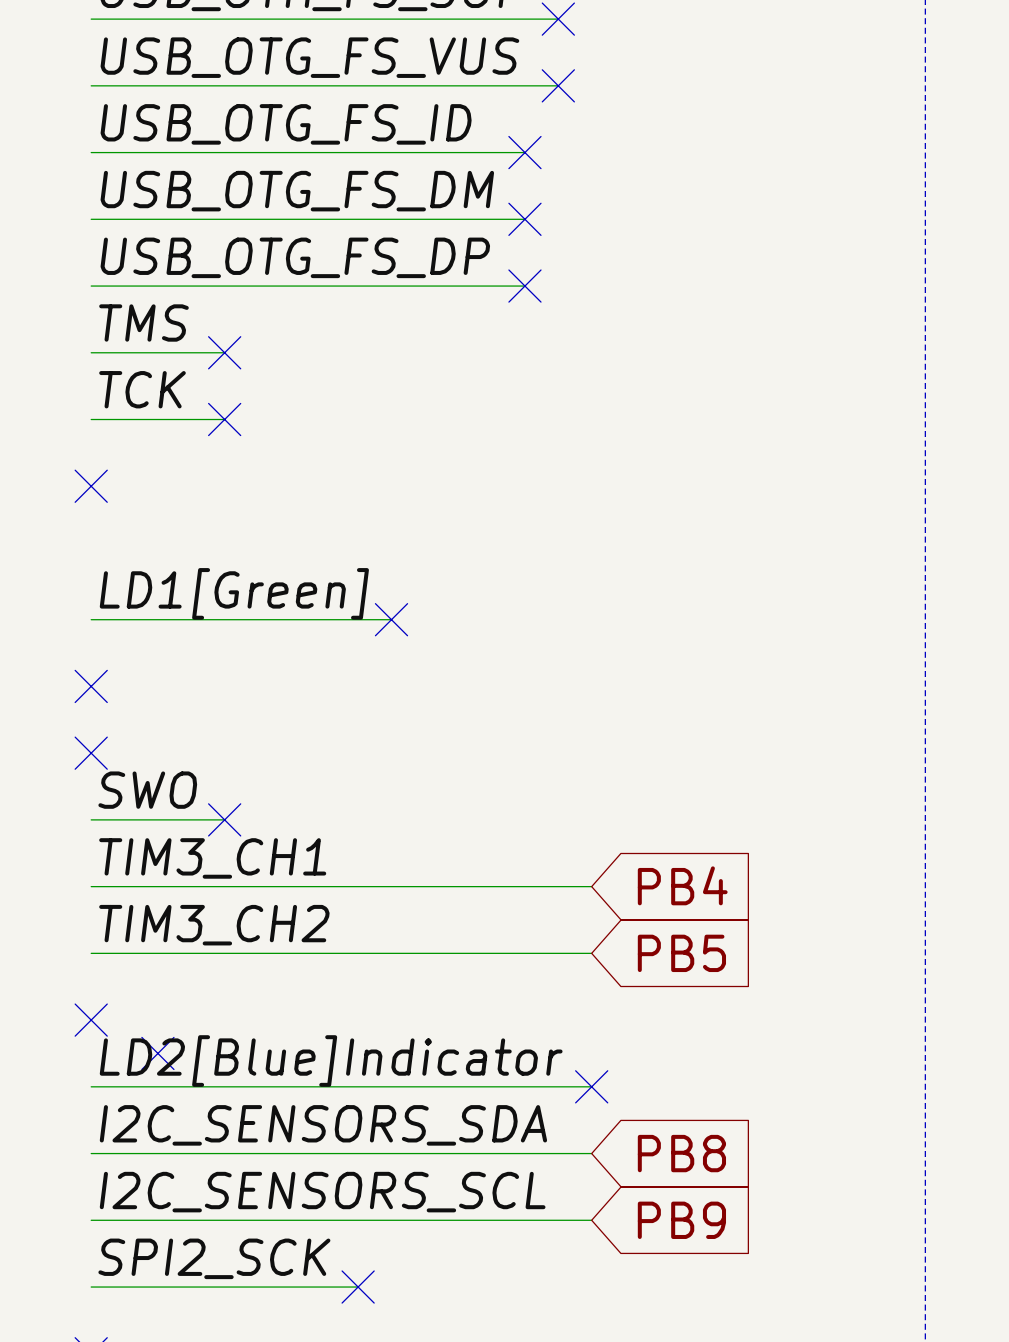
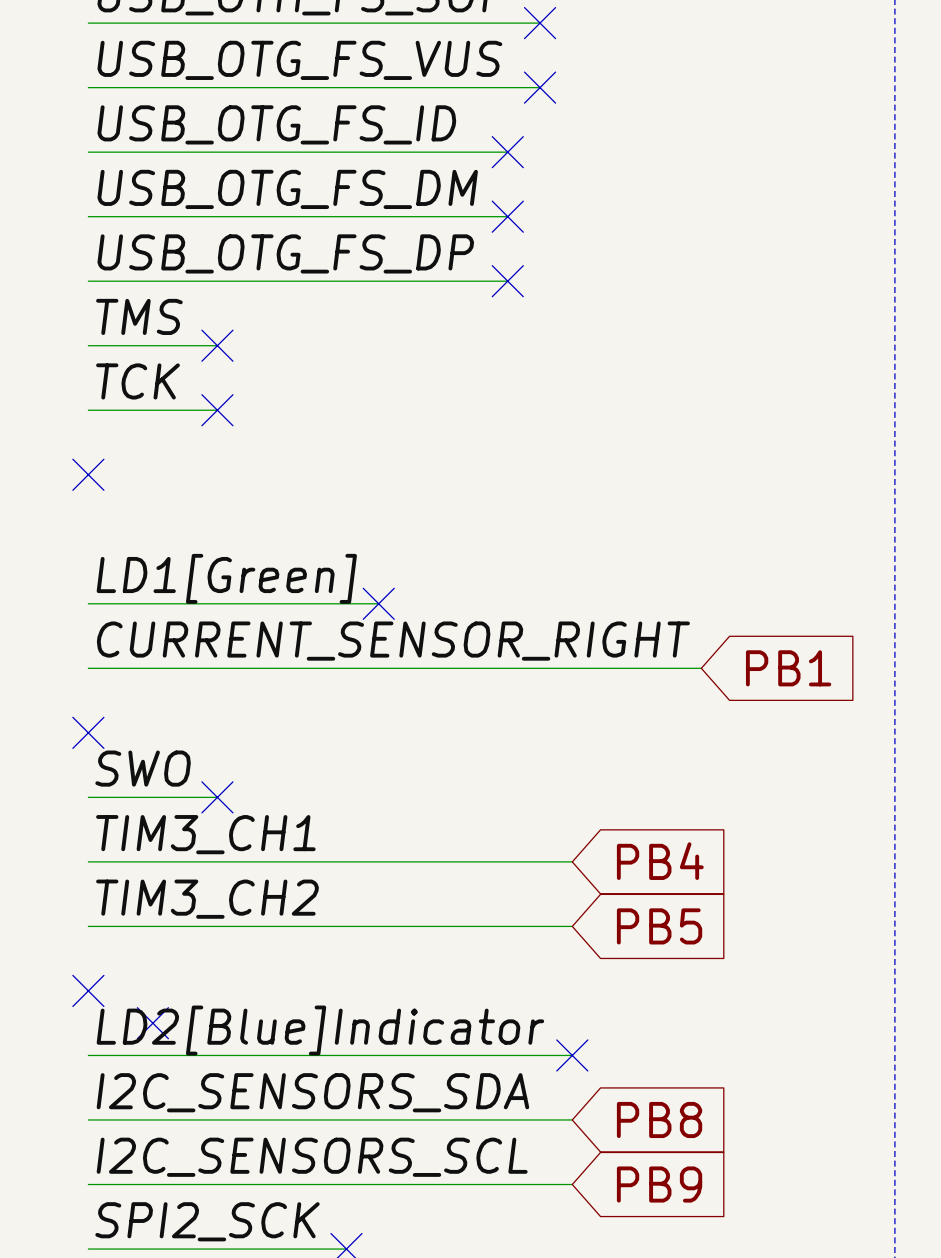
label: none -> CURRENT_SENSOR_RIGHT (393, 641)
wire: none -> (88, 668) (701, 668)
no-connect mark: (91, 686) -> none
global label: none -> PB1 (788, 668)

